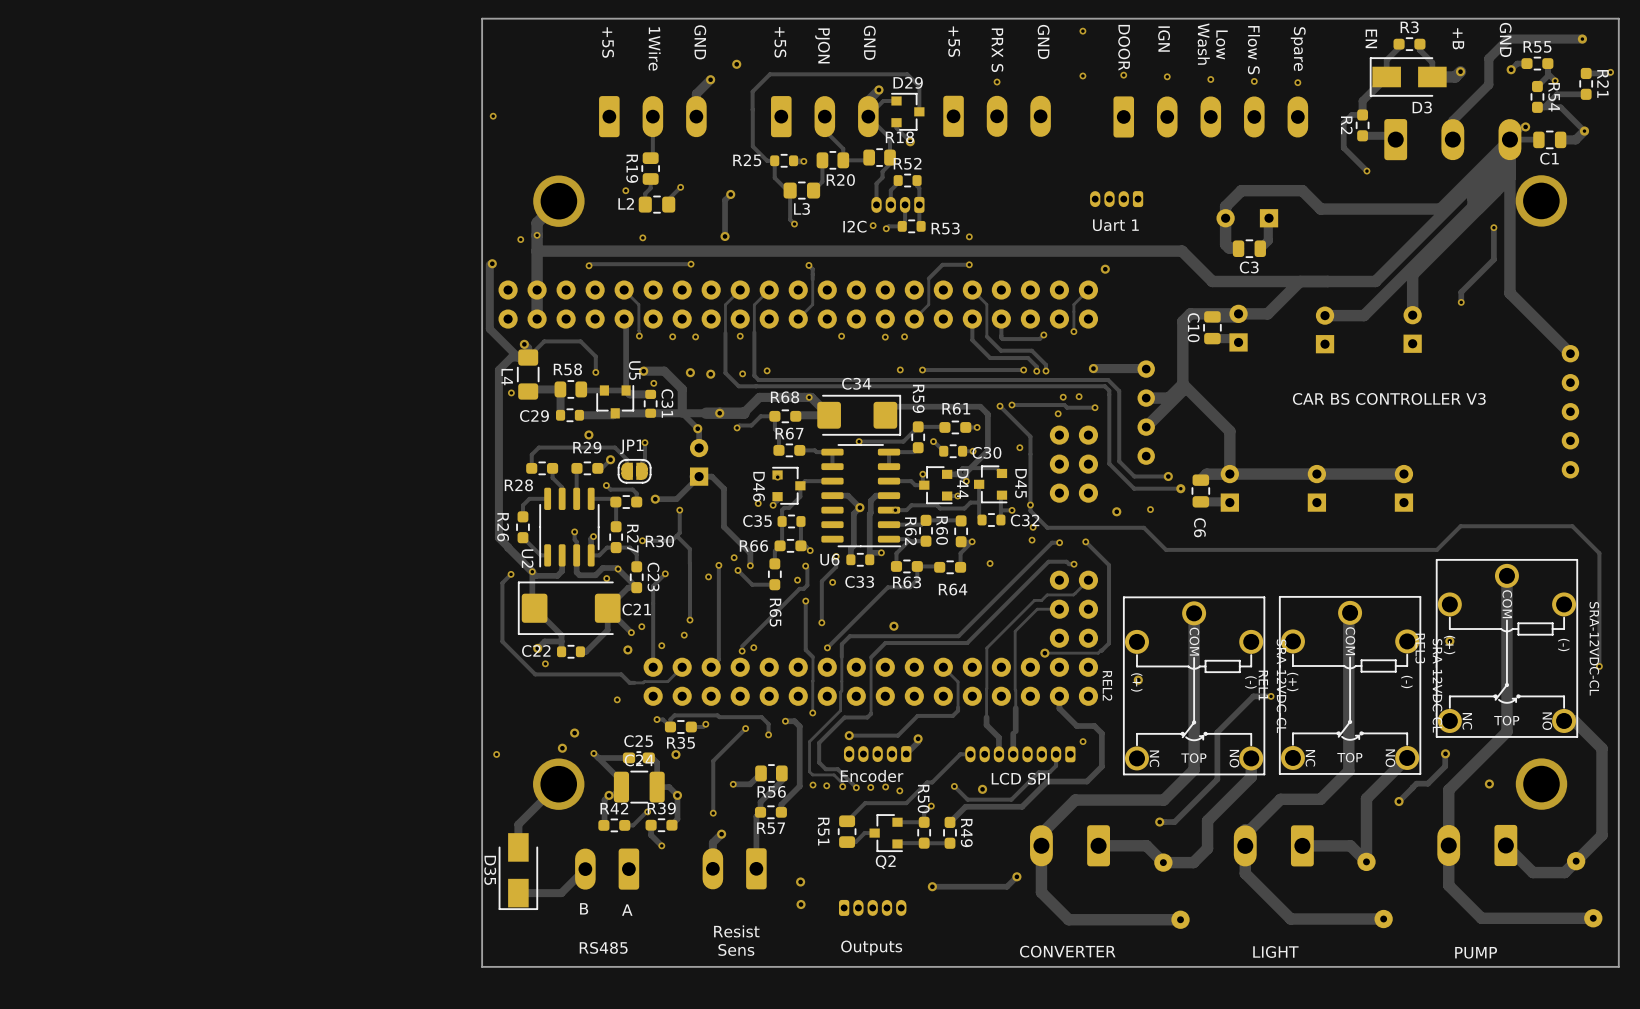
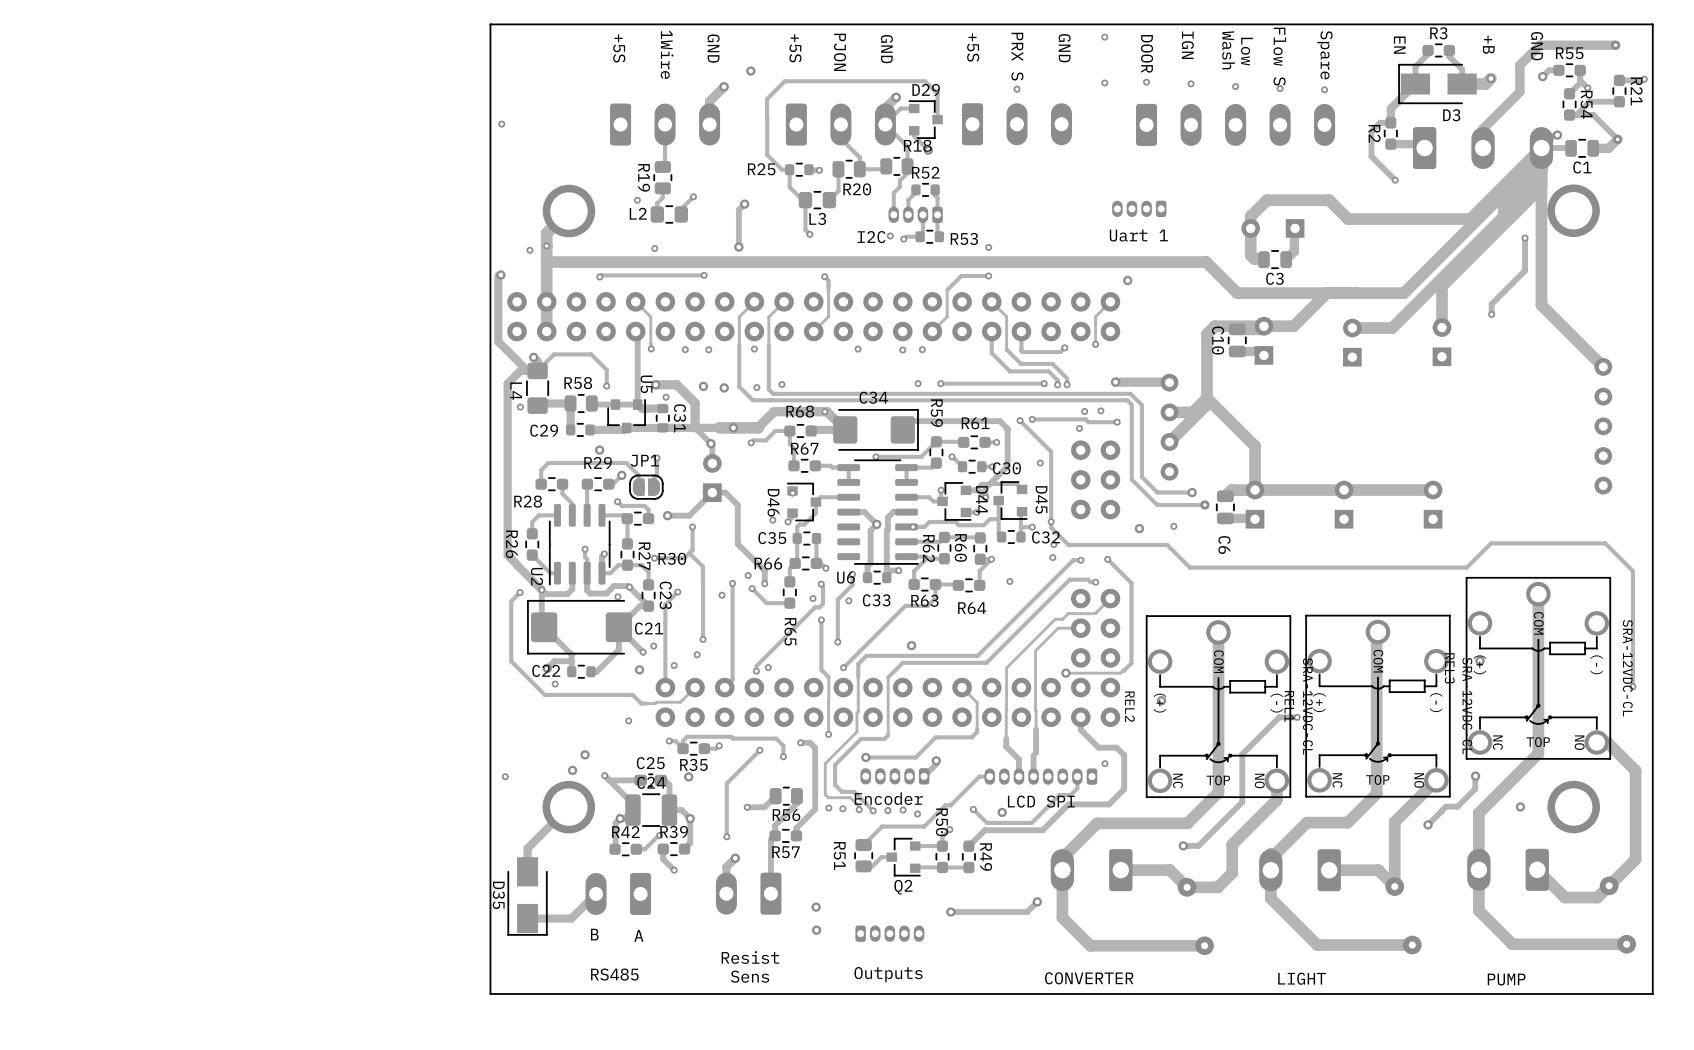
text: CAR BS CONTROLLER V3 (1389, 398) -> none

